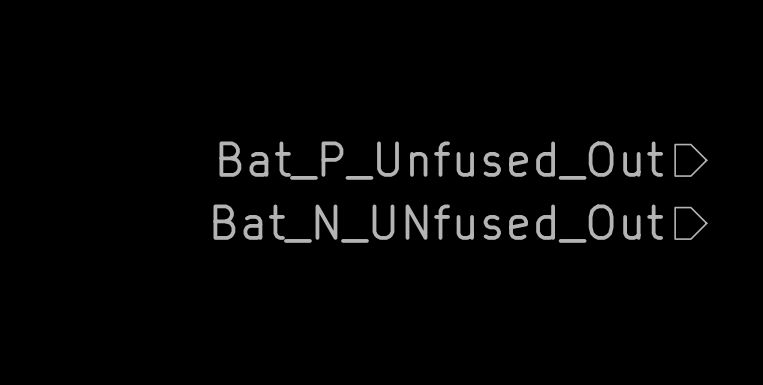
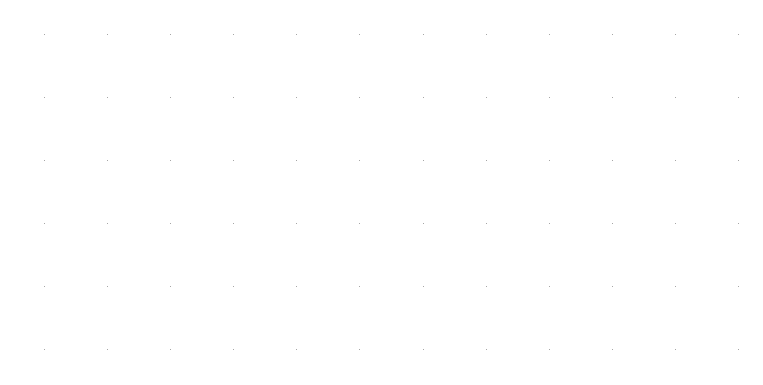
hierarchical label: Bat_P_Unfused_Out (441, 160) -> none
hierarchical label: Bat_N_UNfused_Out (438, 223) -> none

